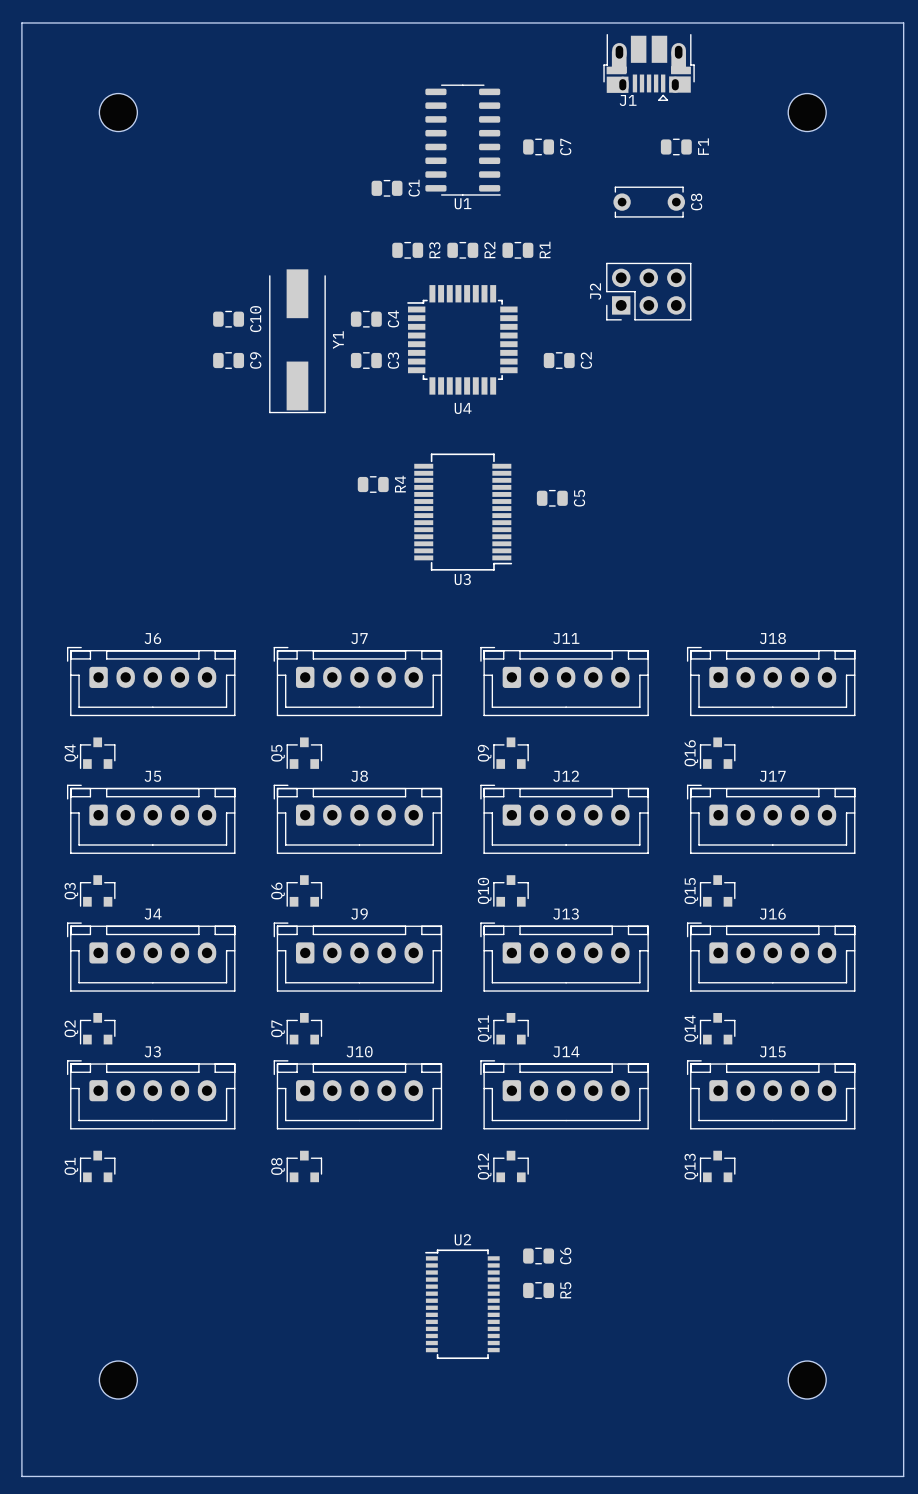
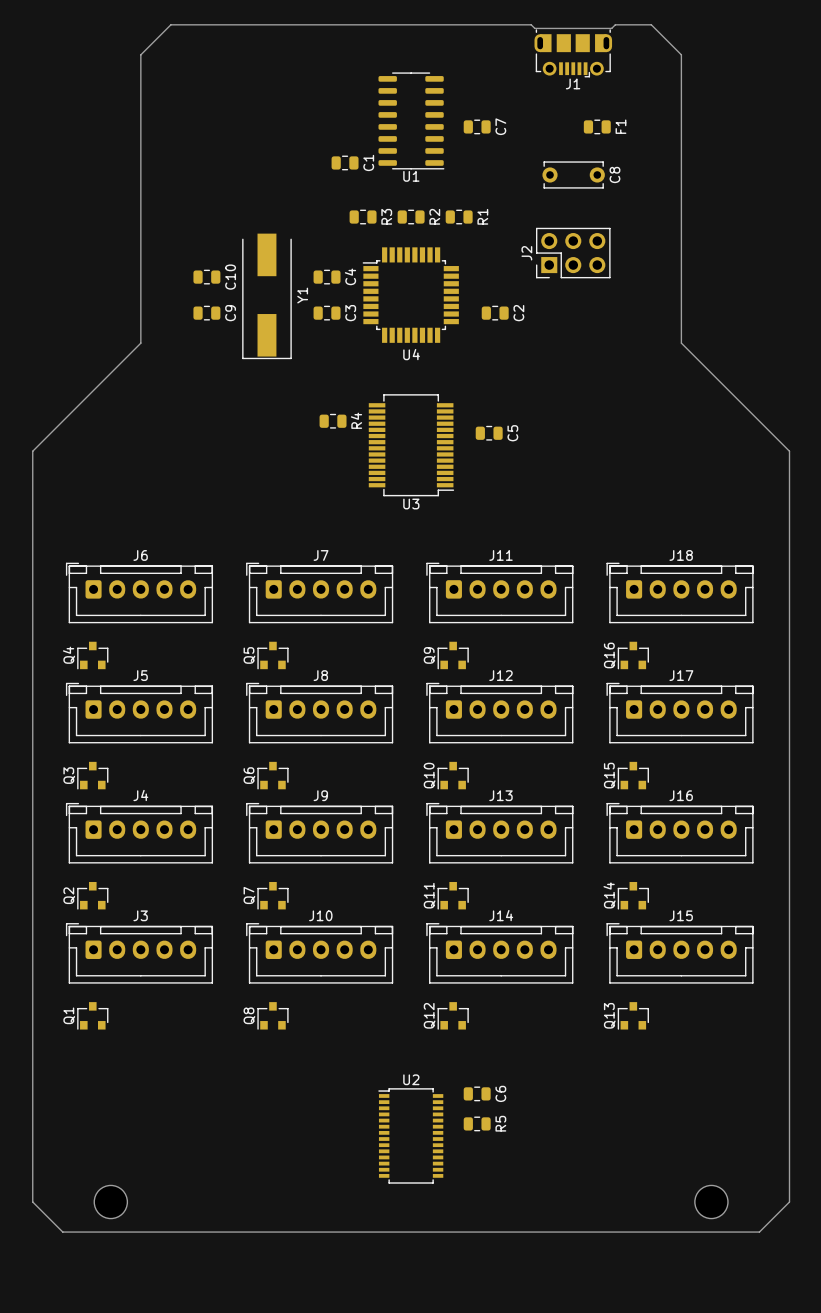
board edge: (21, 22) (21, 1476) (903, 1476) (903, 22) (21, 22) -> (170, 24) (140, 54) (140, 343) (32, 451) (32, 1202) (62, 1232) (759, 1232) (789, 1202) (789, 451) (681, 343) (681, 54) (651, 24) (615, 24) (611, 28) (534, 28) (531, 24) (170, 24)
J1 footprint: [603, 34, 695, 101] -> [534, 29, 613, 78]
part: (118, 112) -> none
part: (807, 112) -> none

